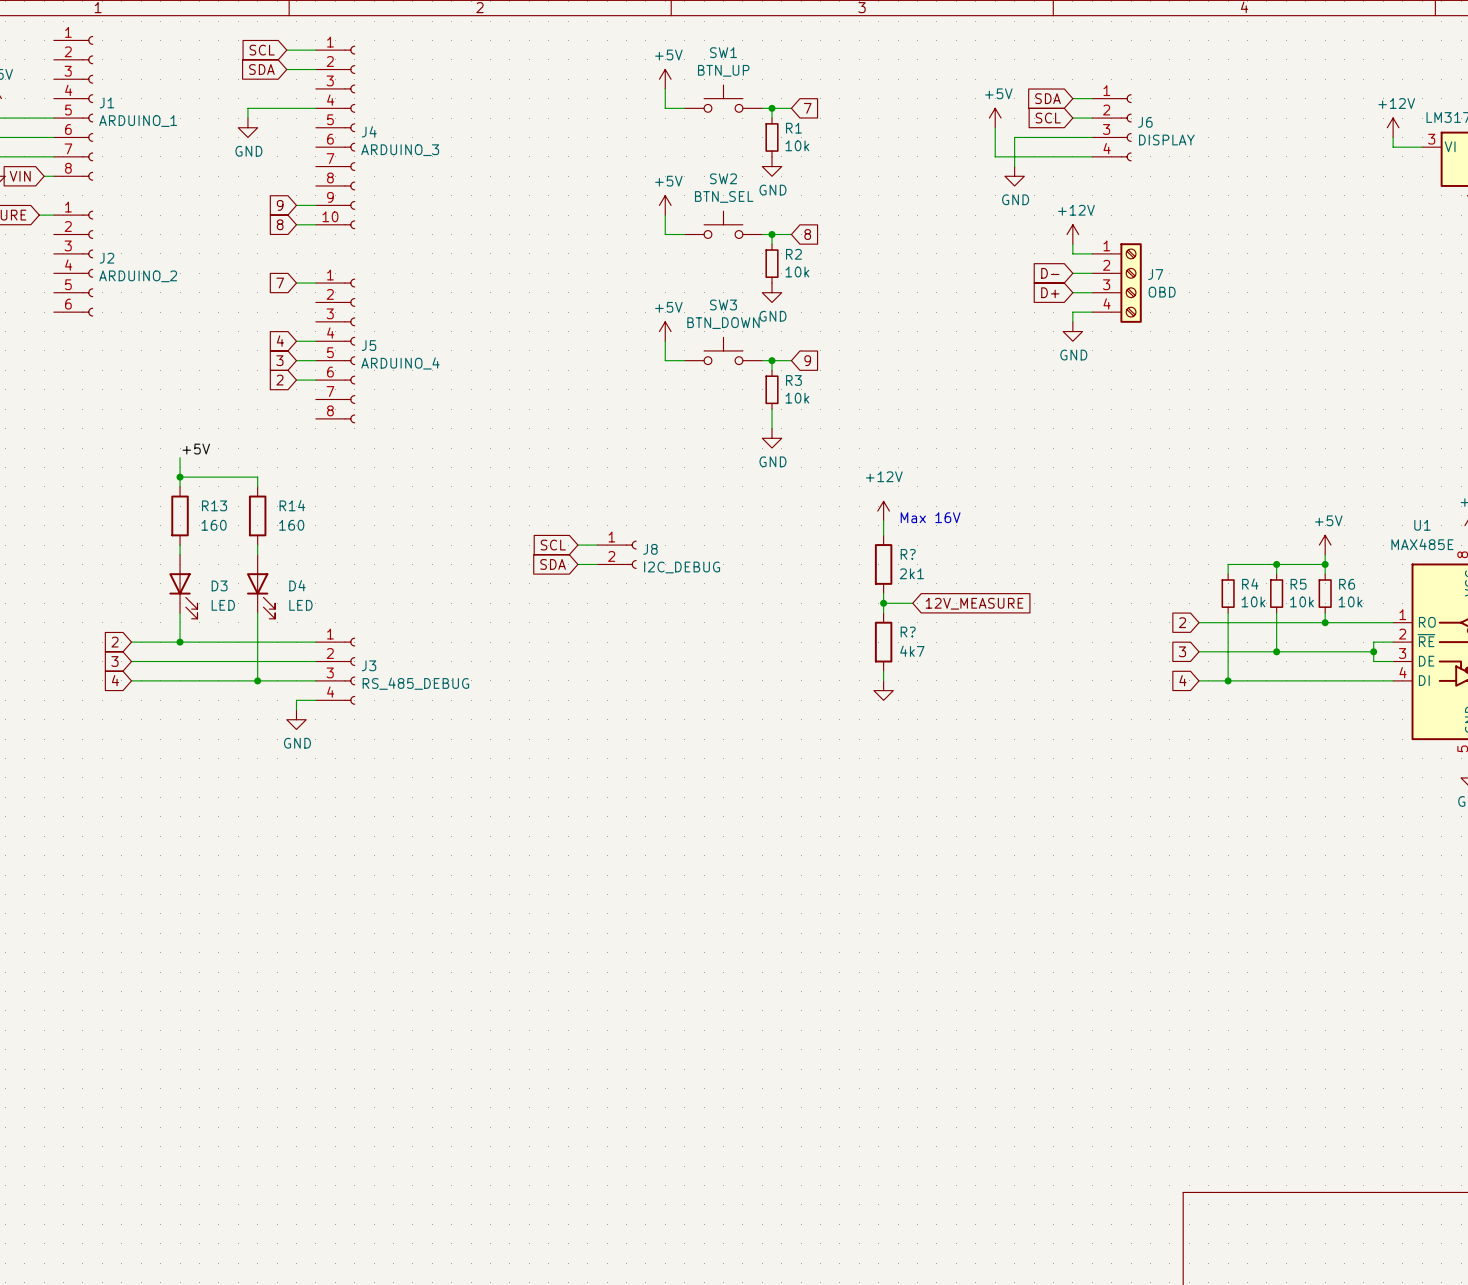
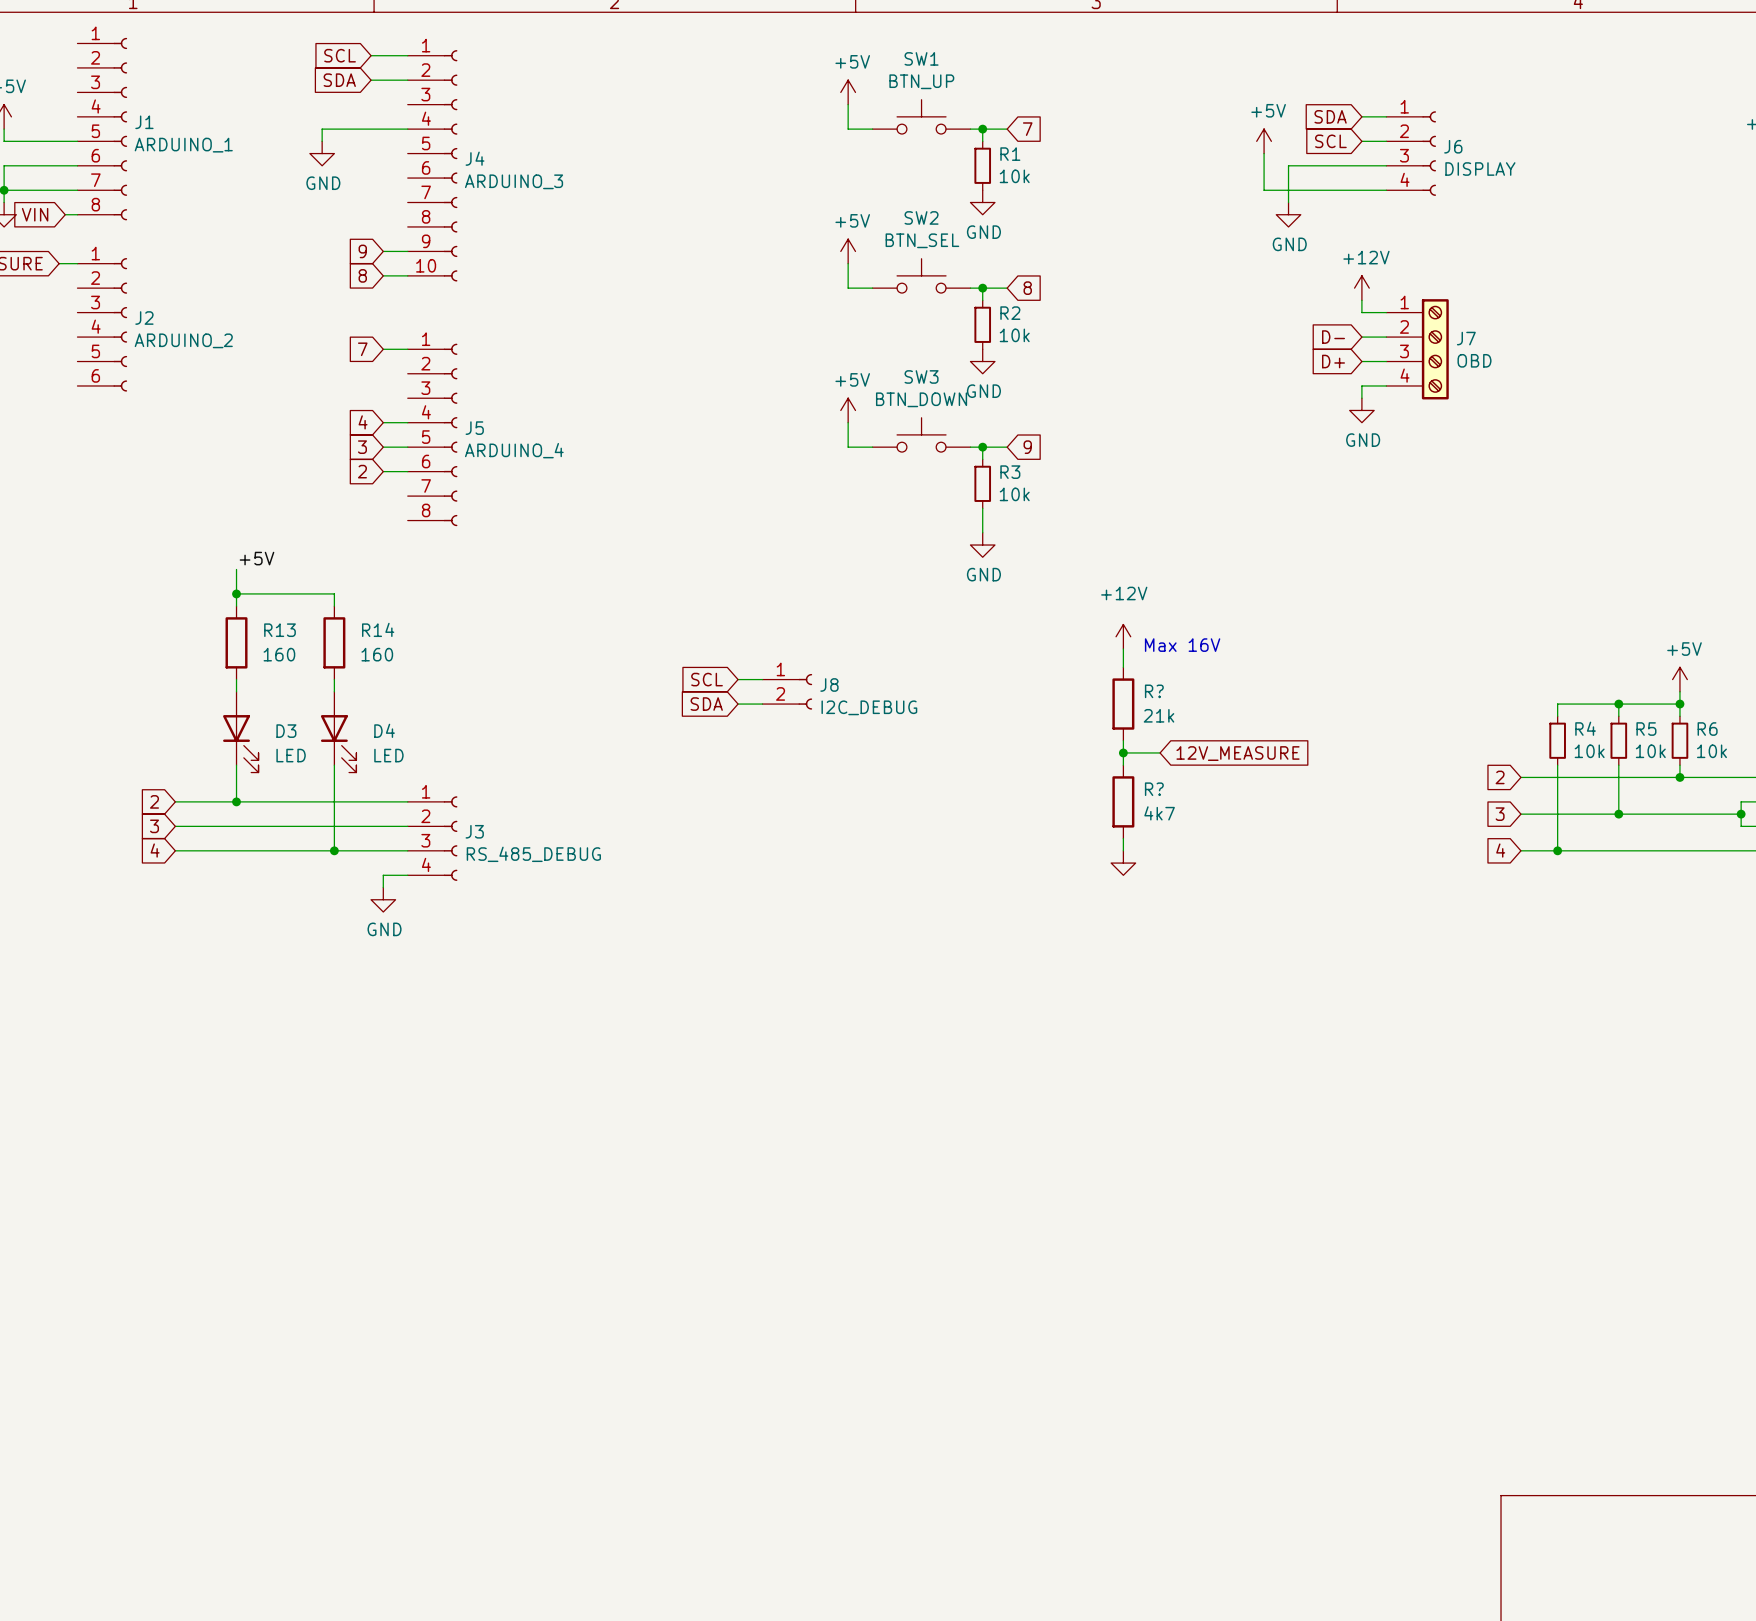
R? value: 2k1 (911, 573) -> 21k (1159, 715)

